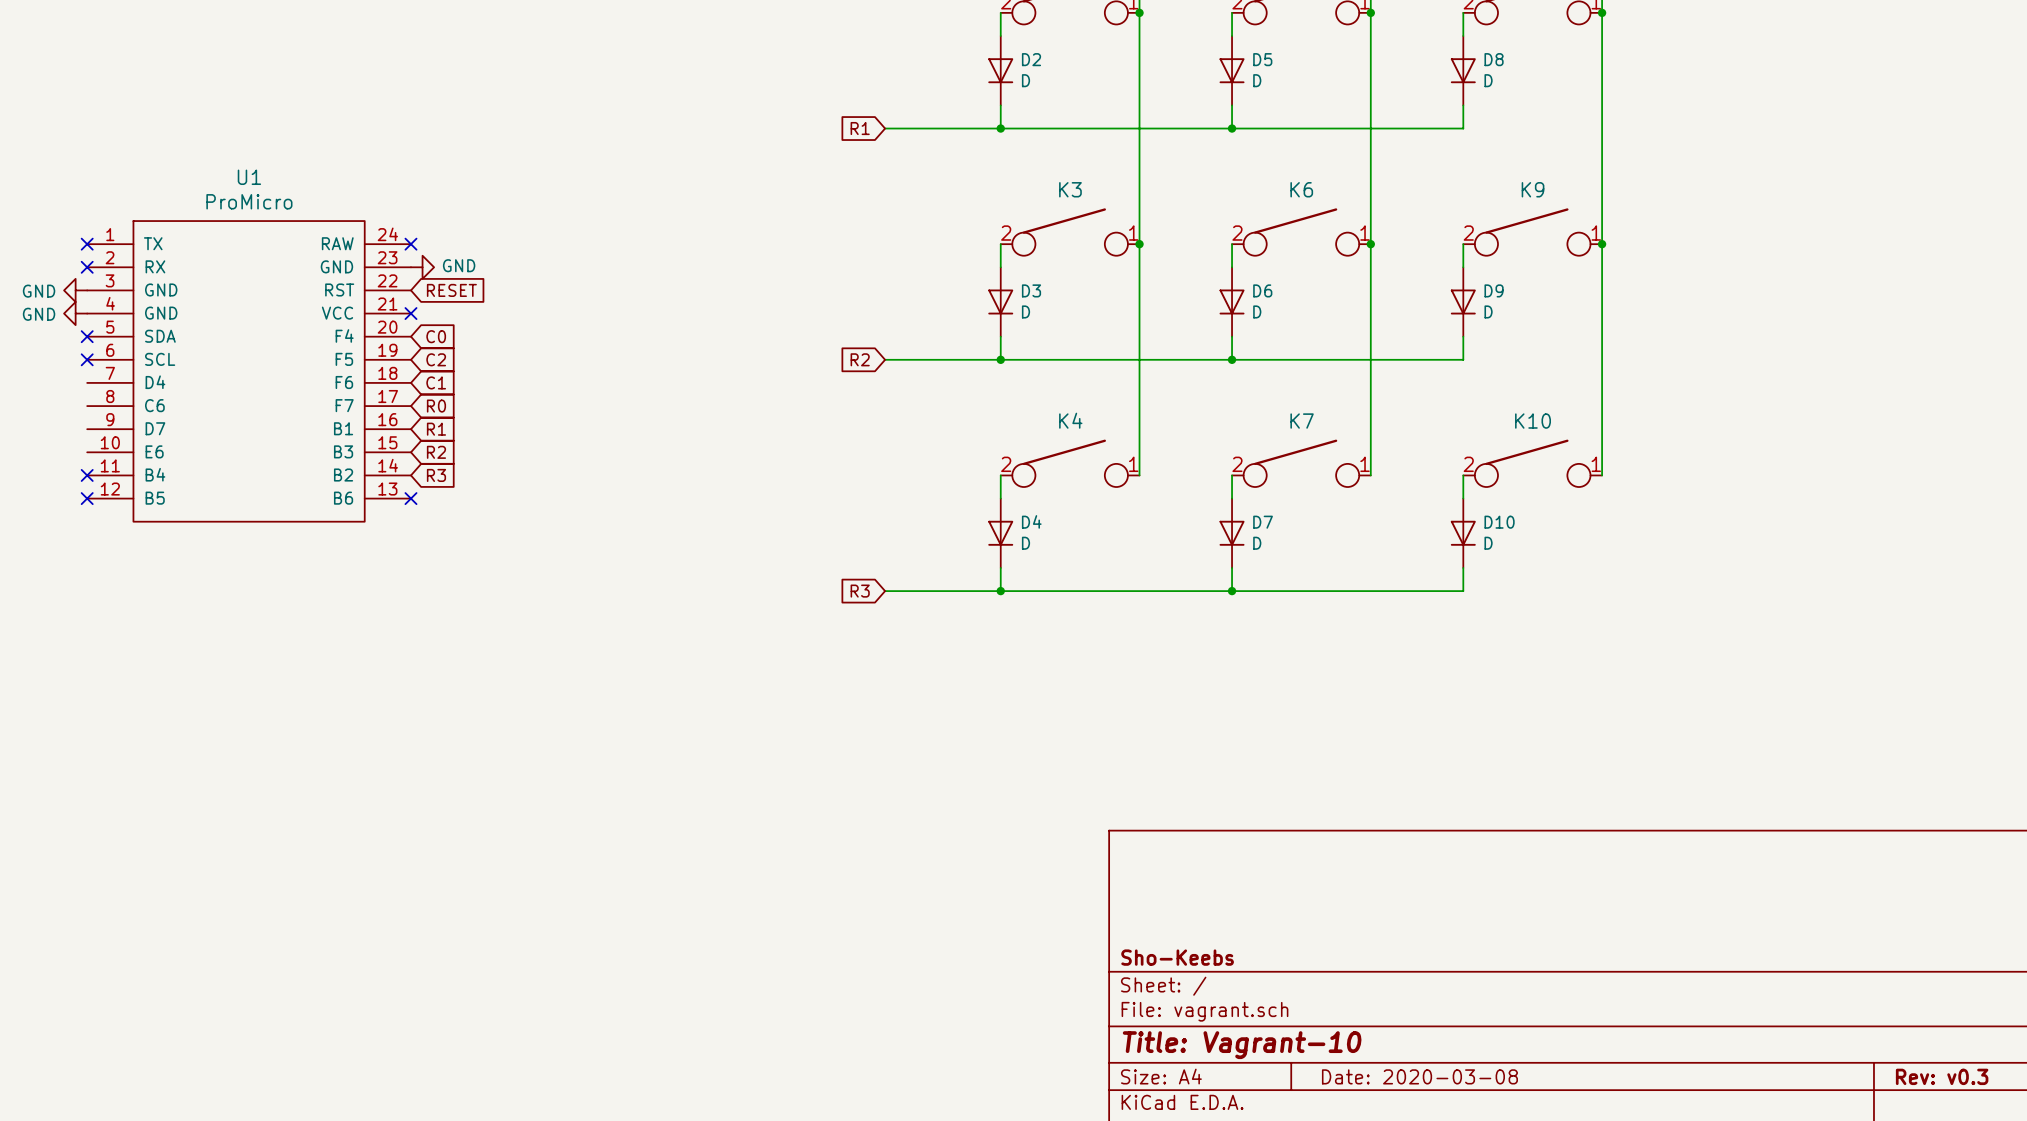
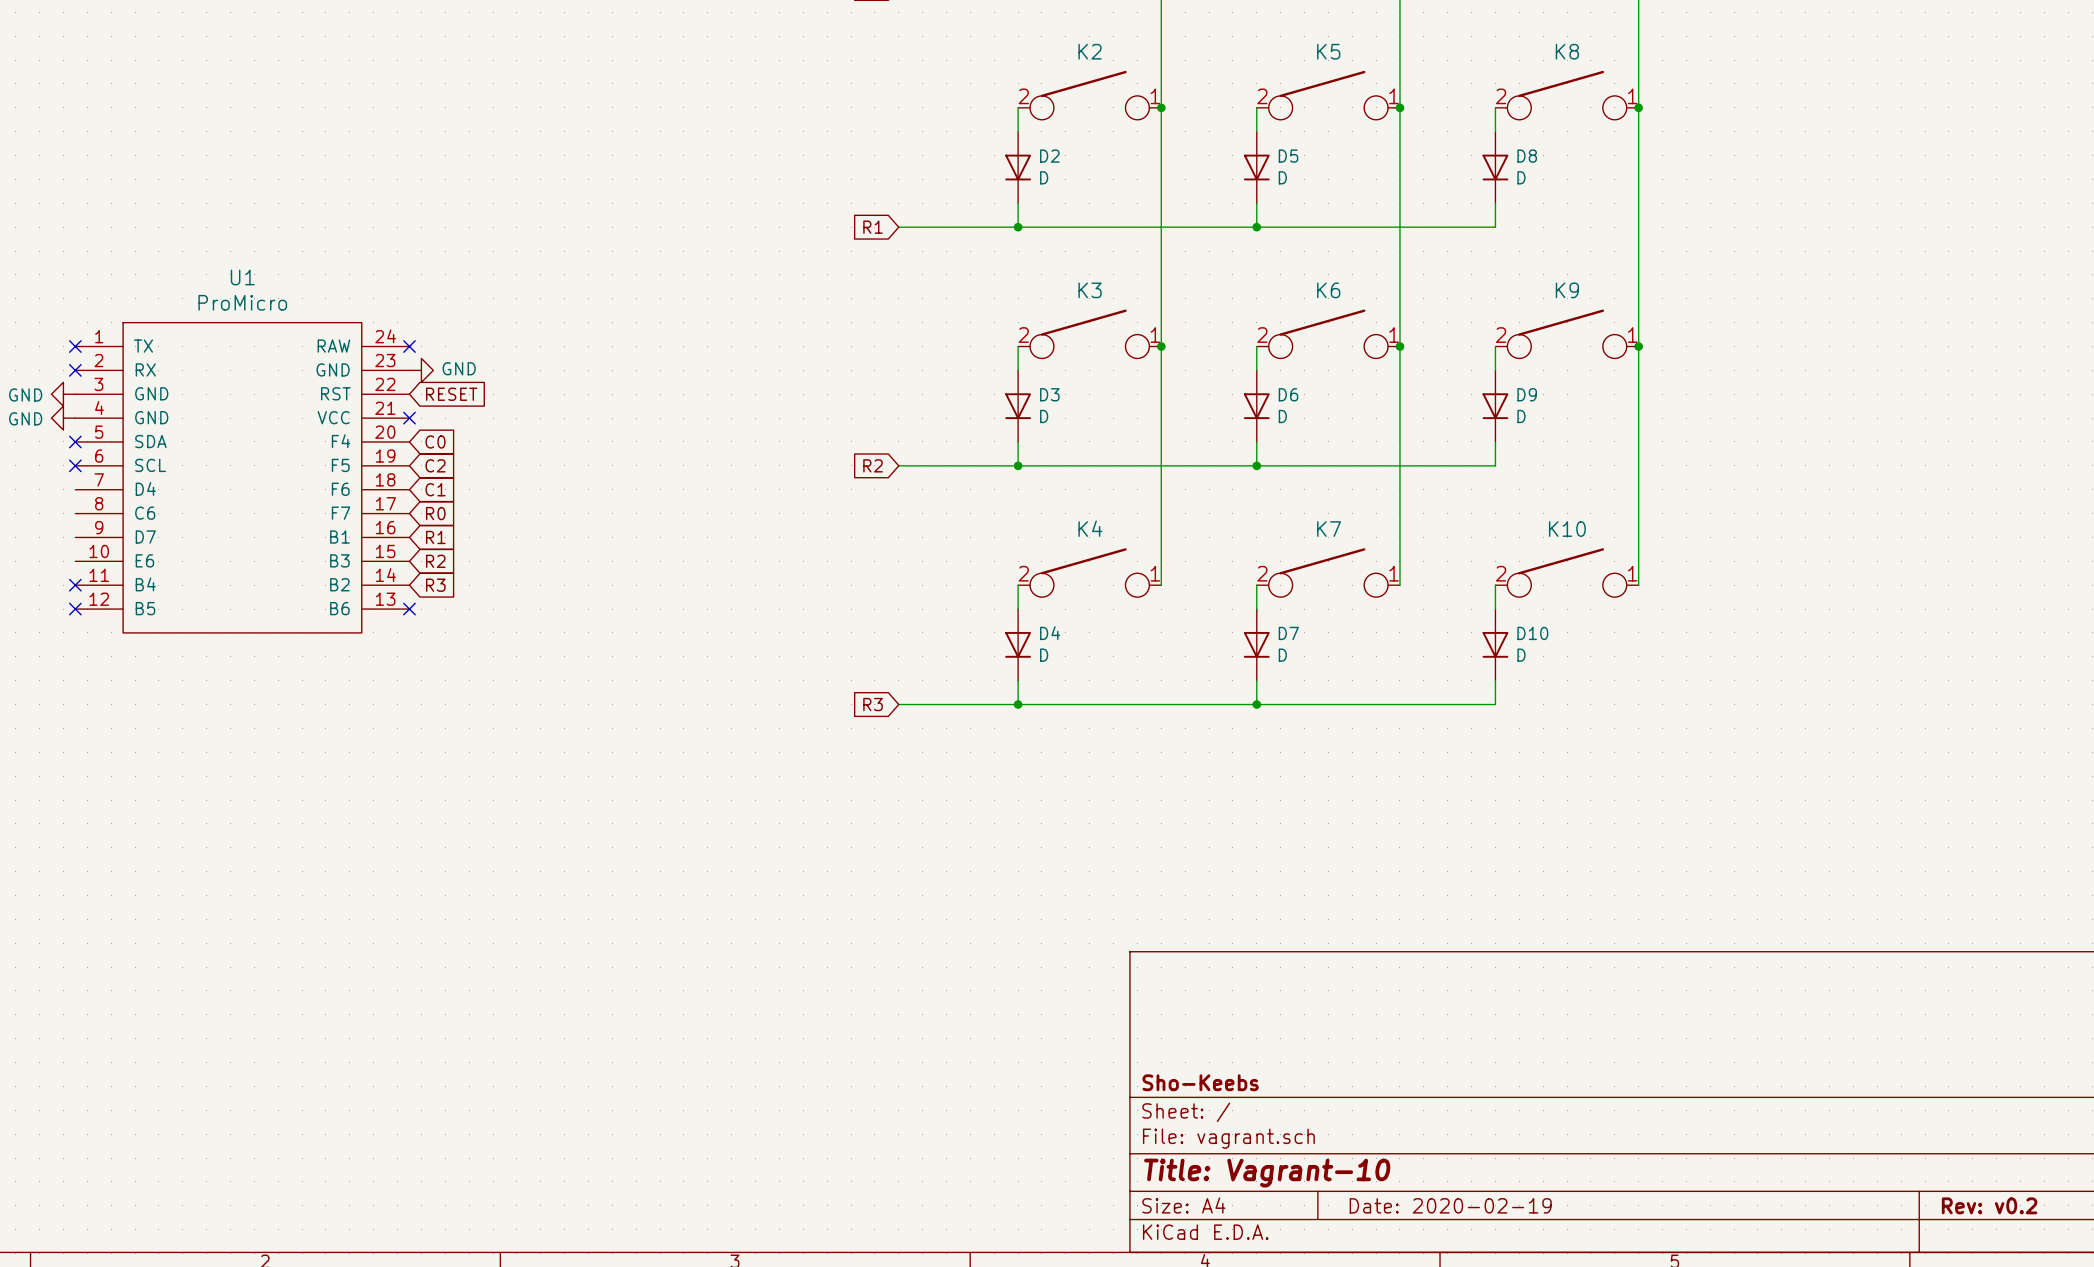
title block: Date: 2020-03-08 (1419, 1076) -> Date: 2020-02-19 (1450, 1205)
title block: Rev: v0.3 (1942, 1076) -> Rev: v0.2 (1989, 1205)

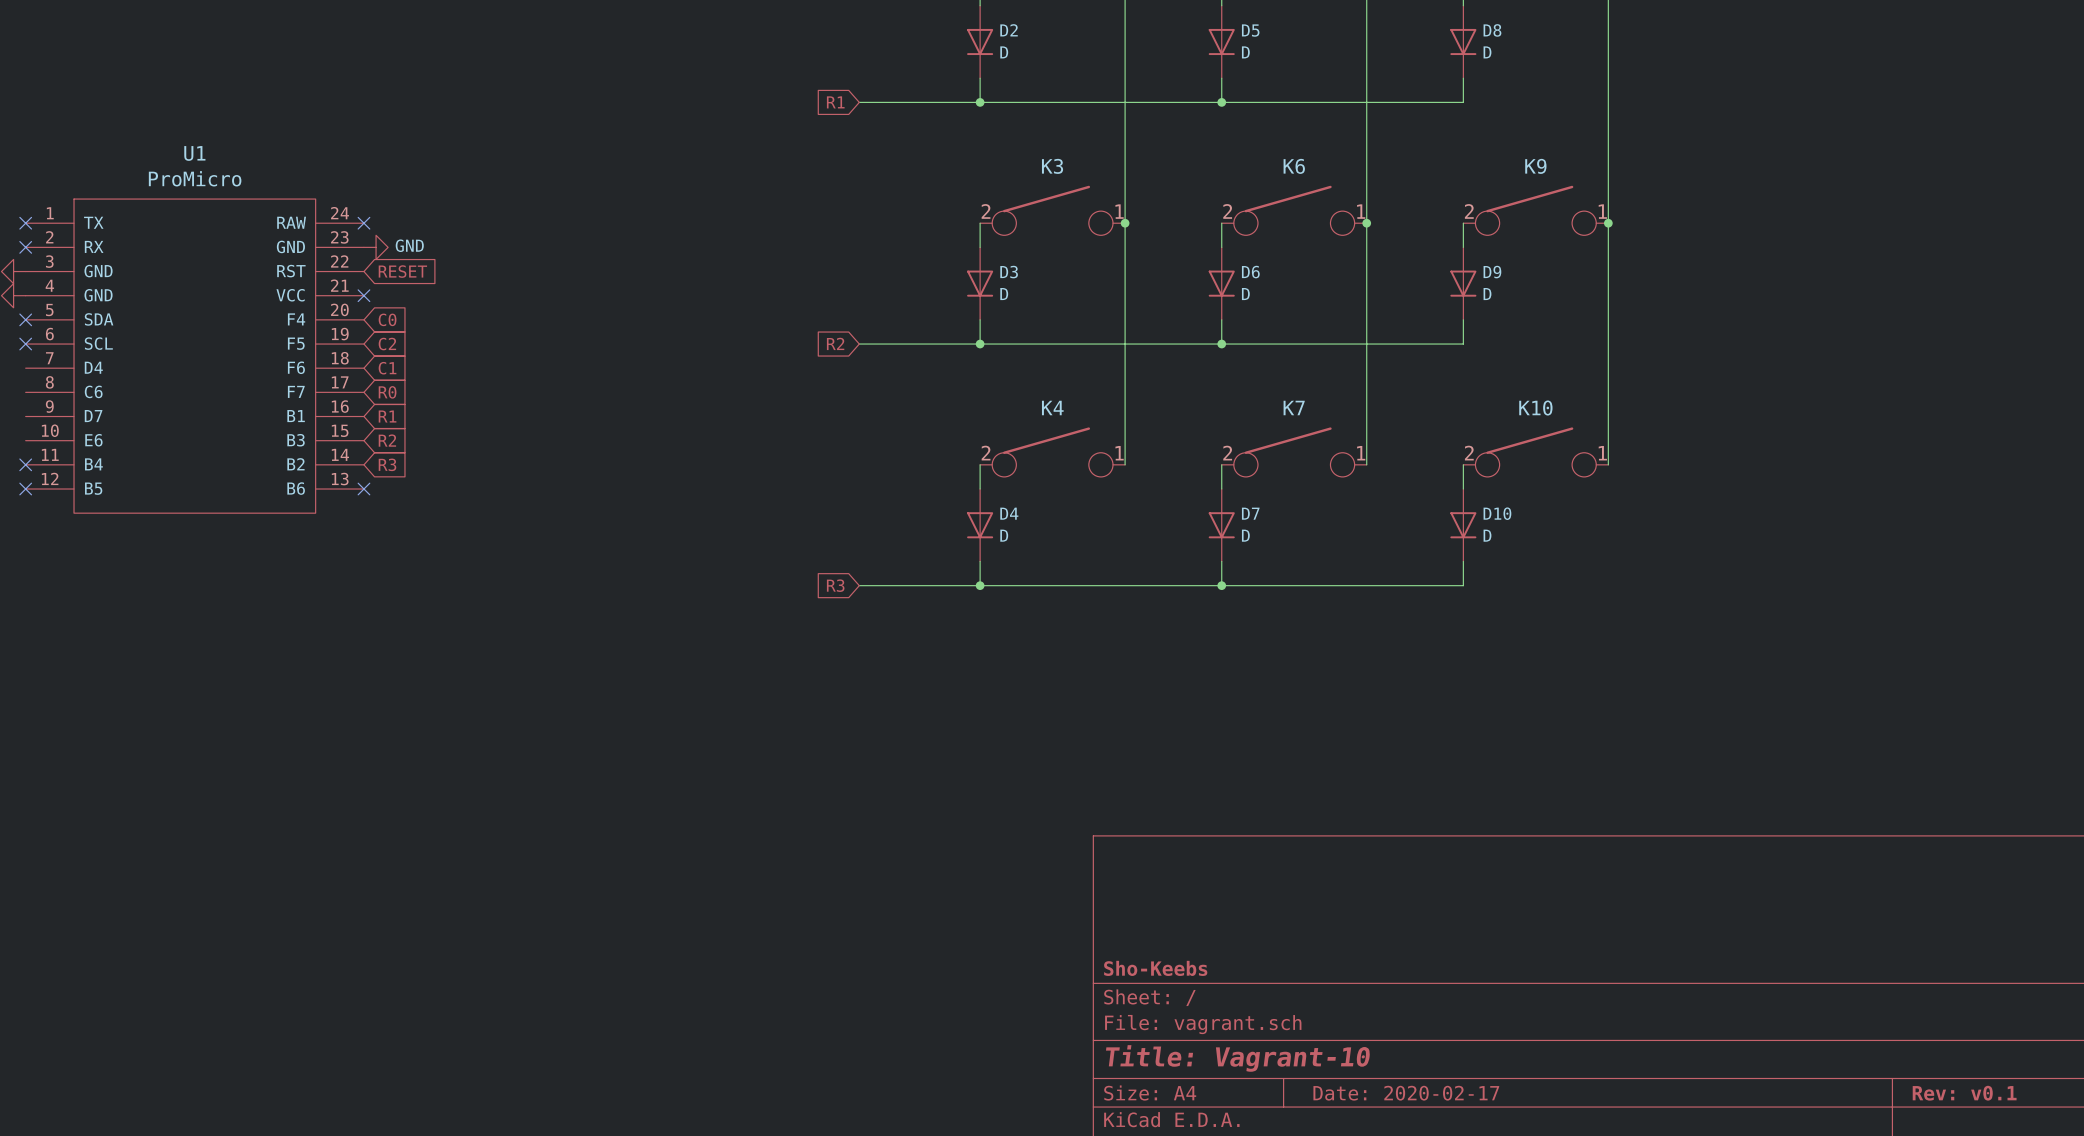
title block: Date: 2020-02-19 (1450, 1205) -> Date: 2020-02-17 (1406, 1093)
title block: Rev: v0.2 (1989, 1205) -> Rev: v0.1 (1964, 1093)

